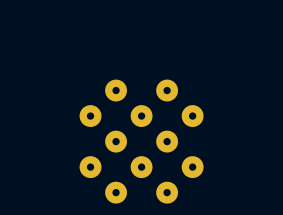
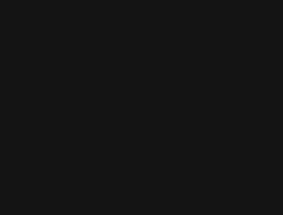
part: (141, 141) -> none

